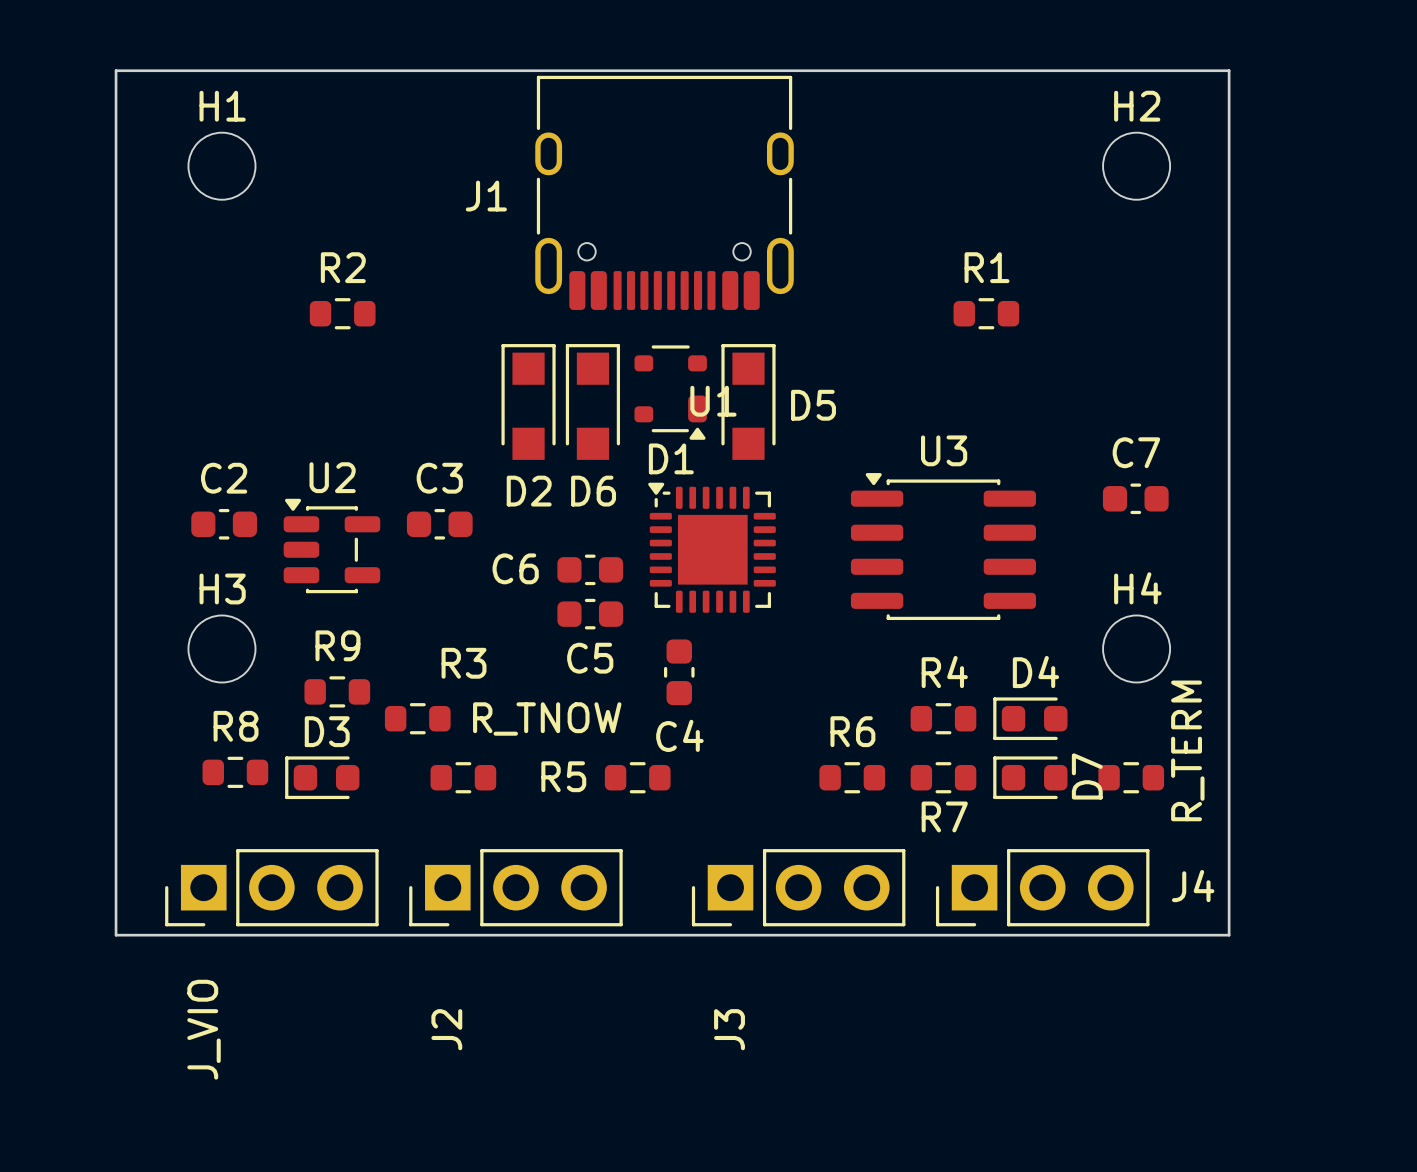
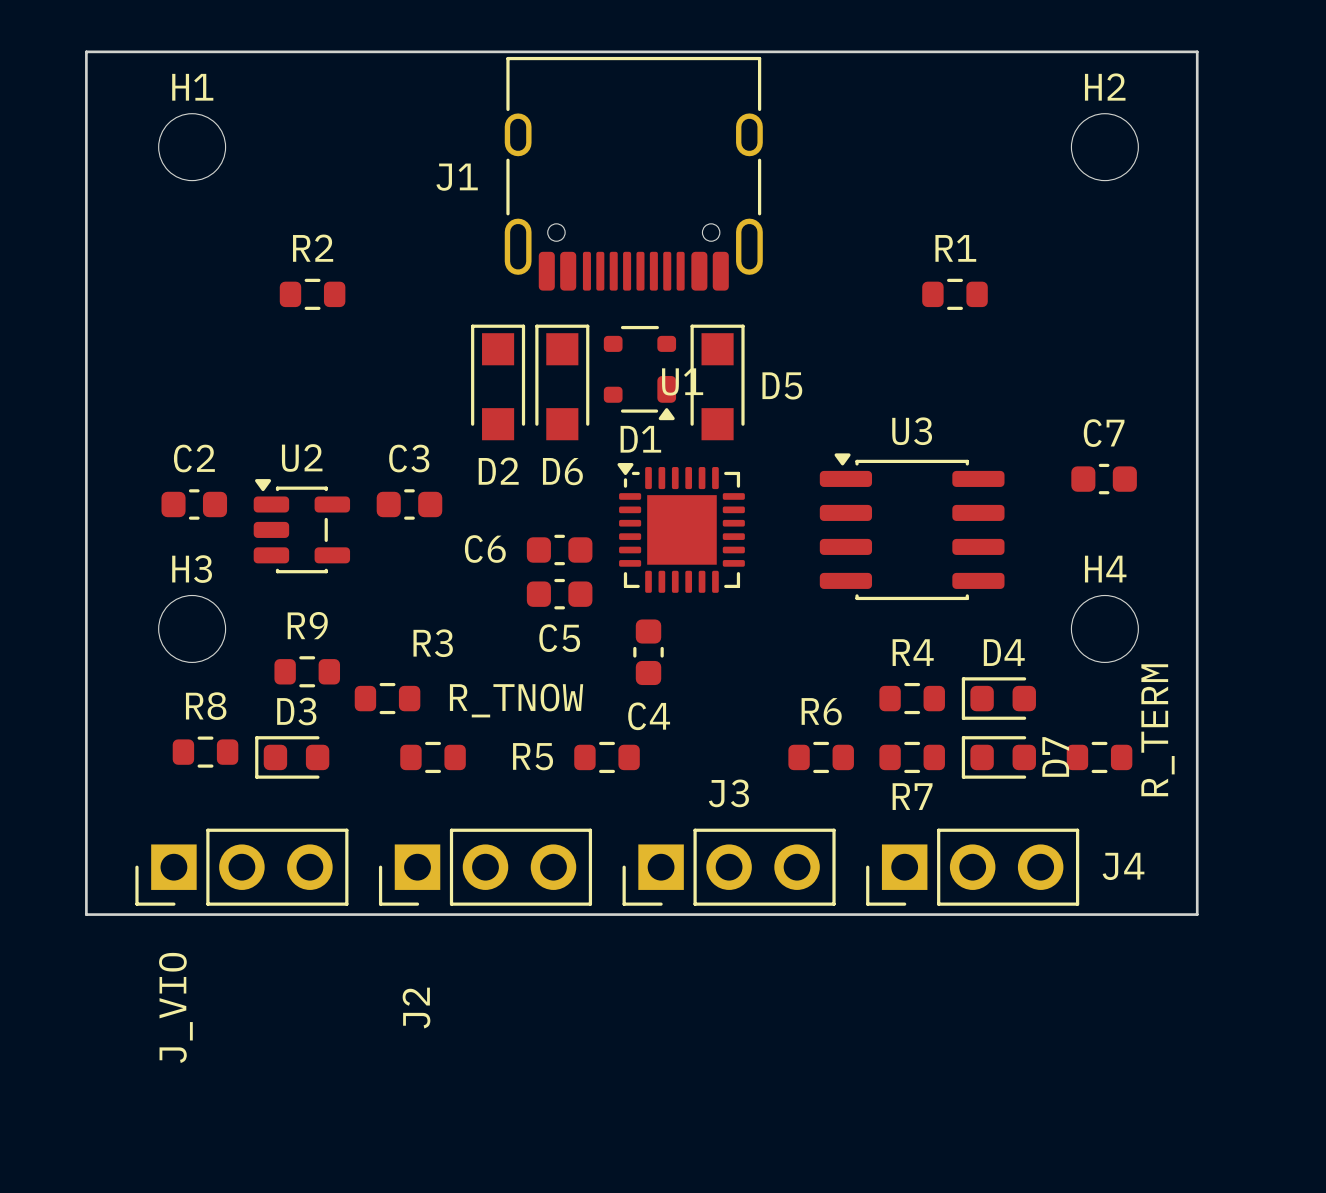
J3 position: (798, 887) -> (729, 867)
J4 position: (1042, 887) -> (972, 867)
J3 name rotation: 0° (729, 1029) -> 90° clockwise (728, 793)
J3 name position: J3 (729, 1029) -> J3 (728, 793)

